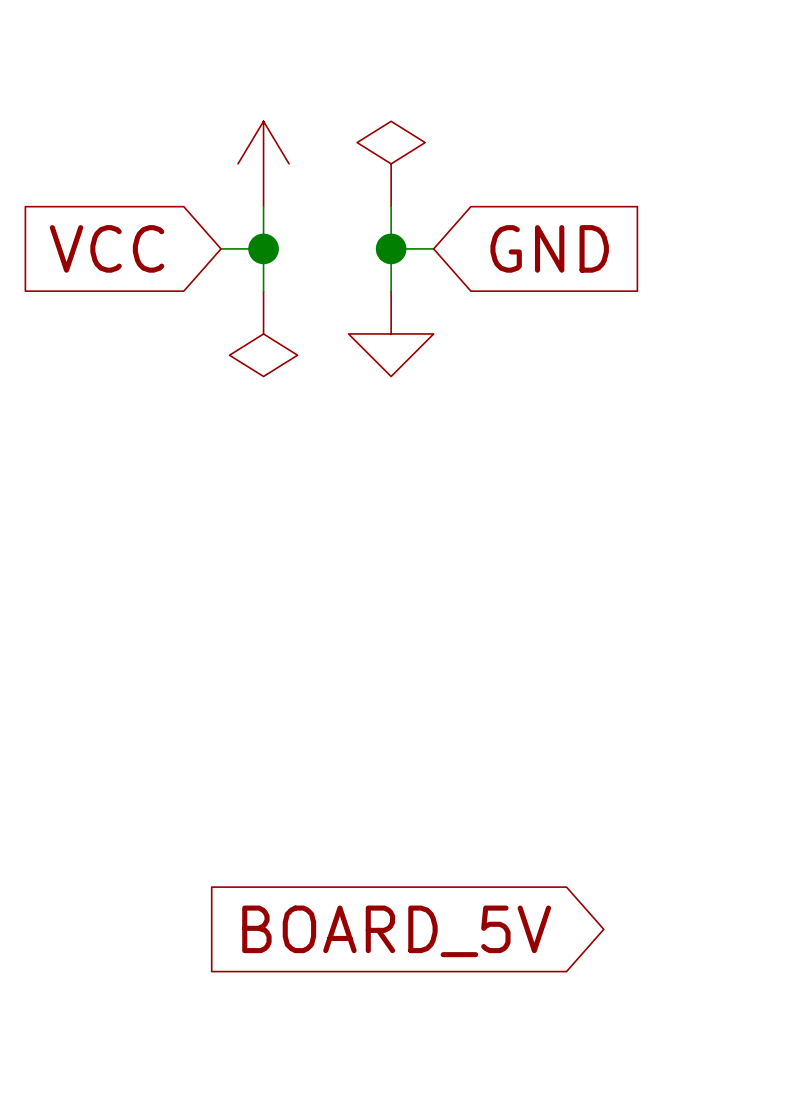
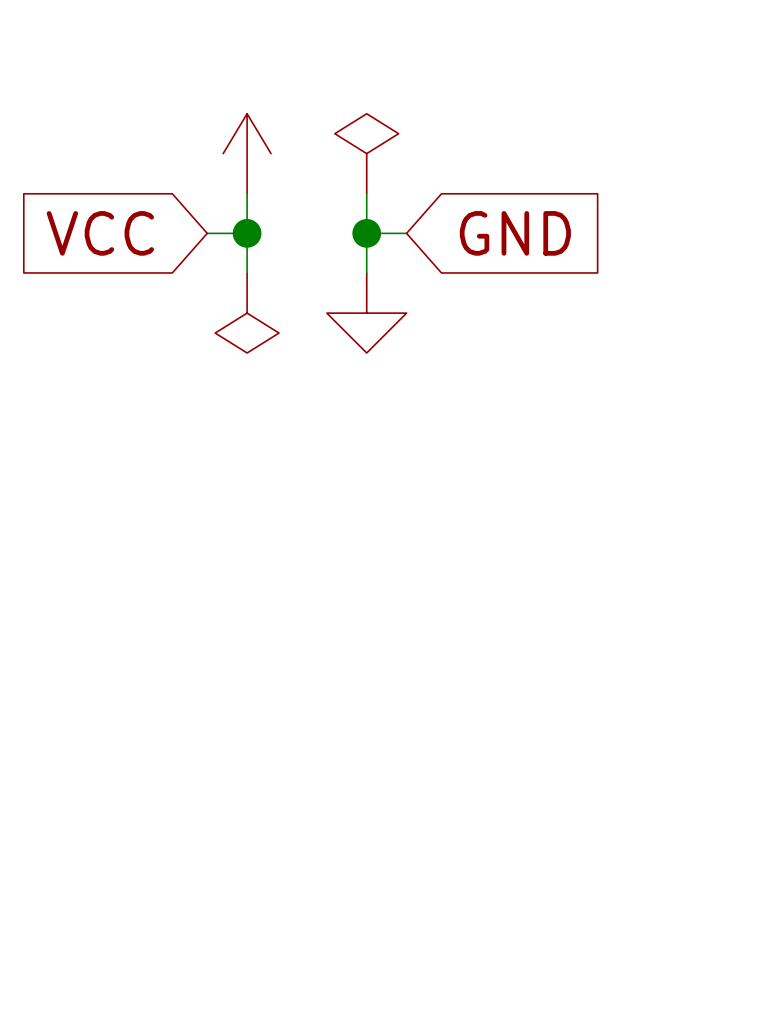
global label: BOARD_5V (396, 931) -> none

